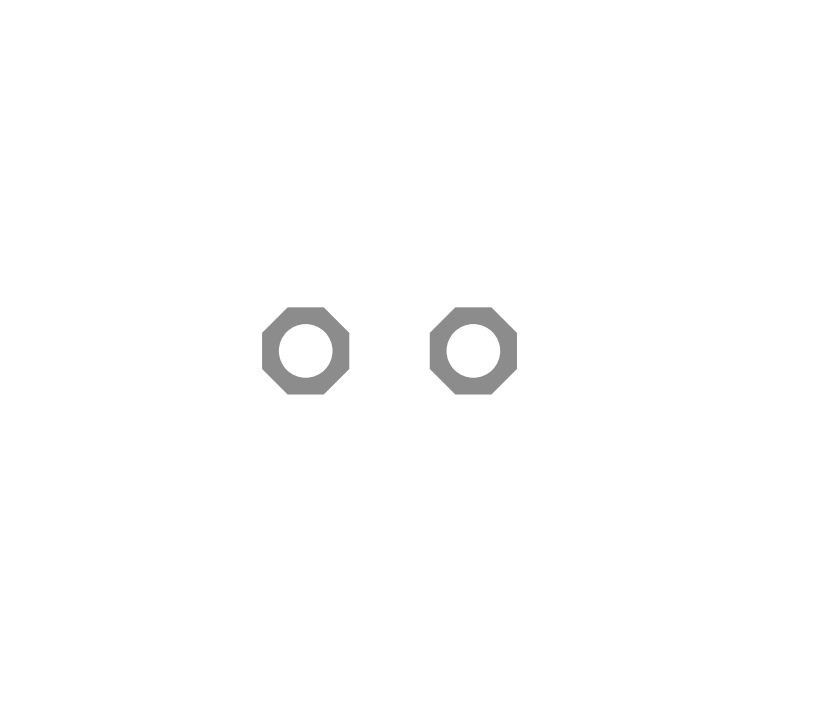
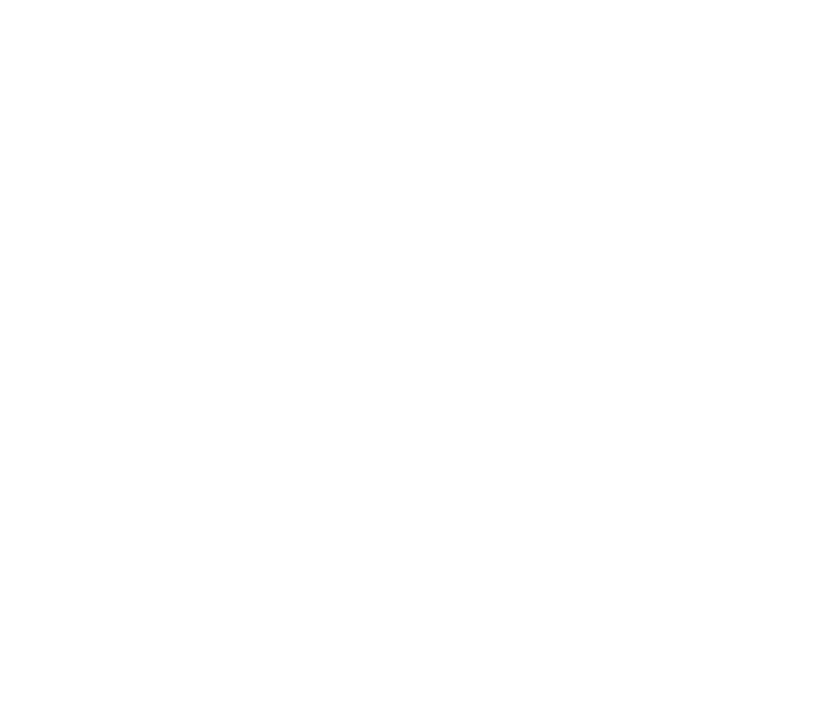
part: (389, 350) -> none

